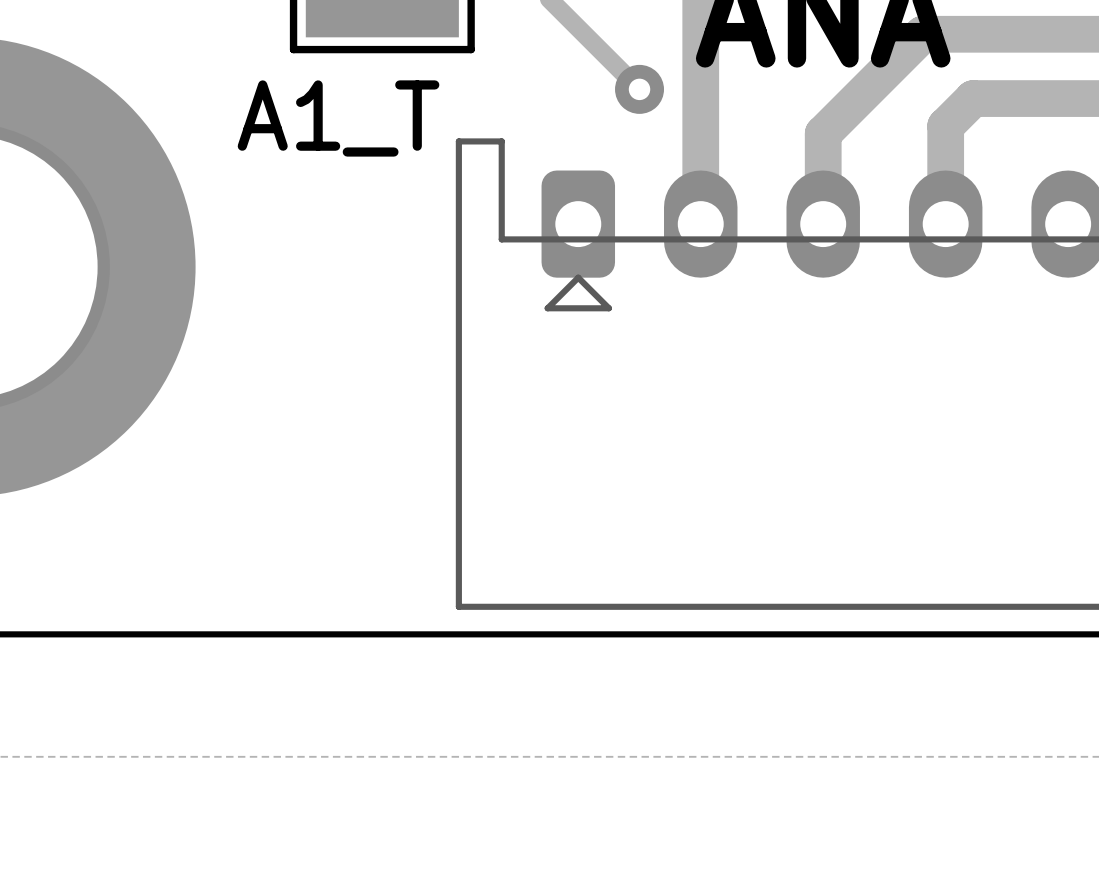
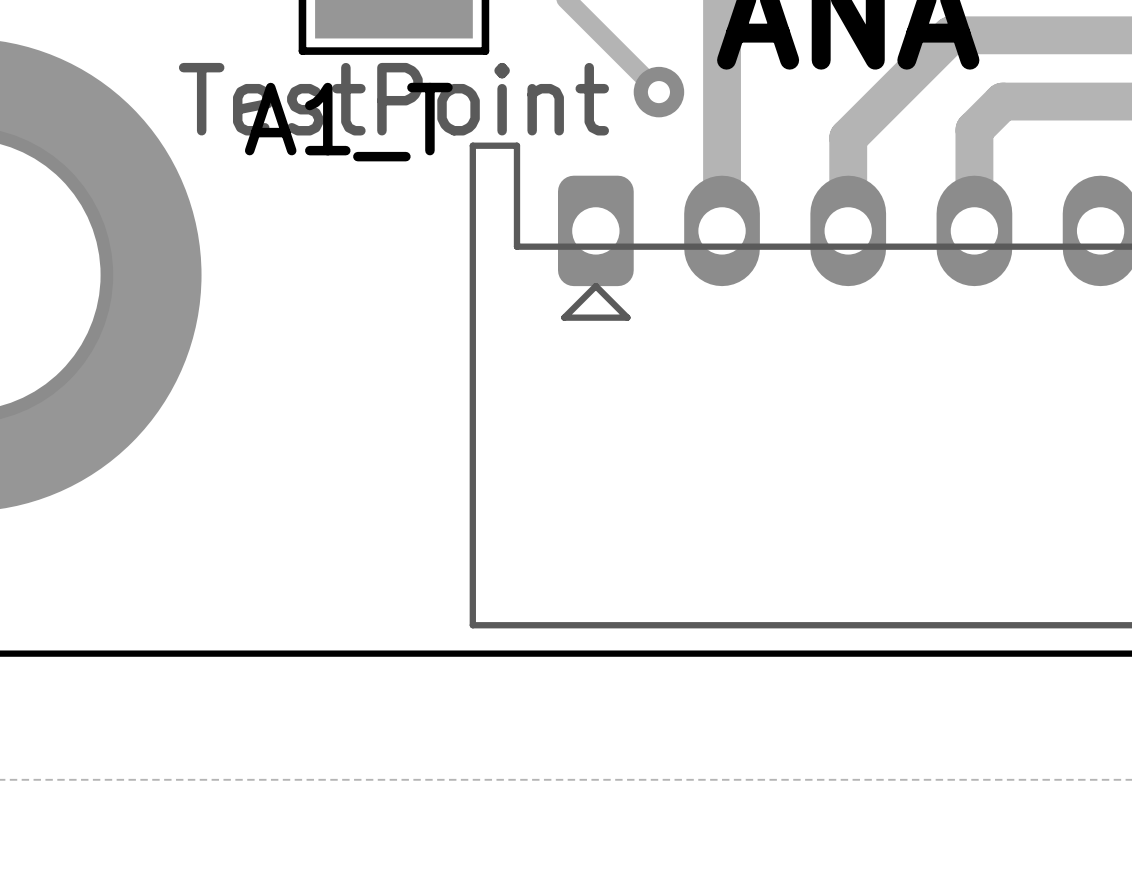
part value: none -> TestPoint (393, 99)

